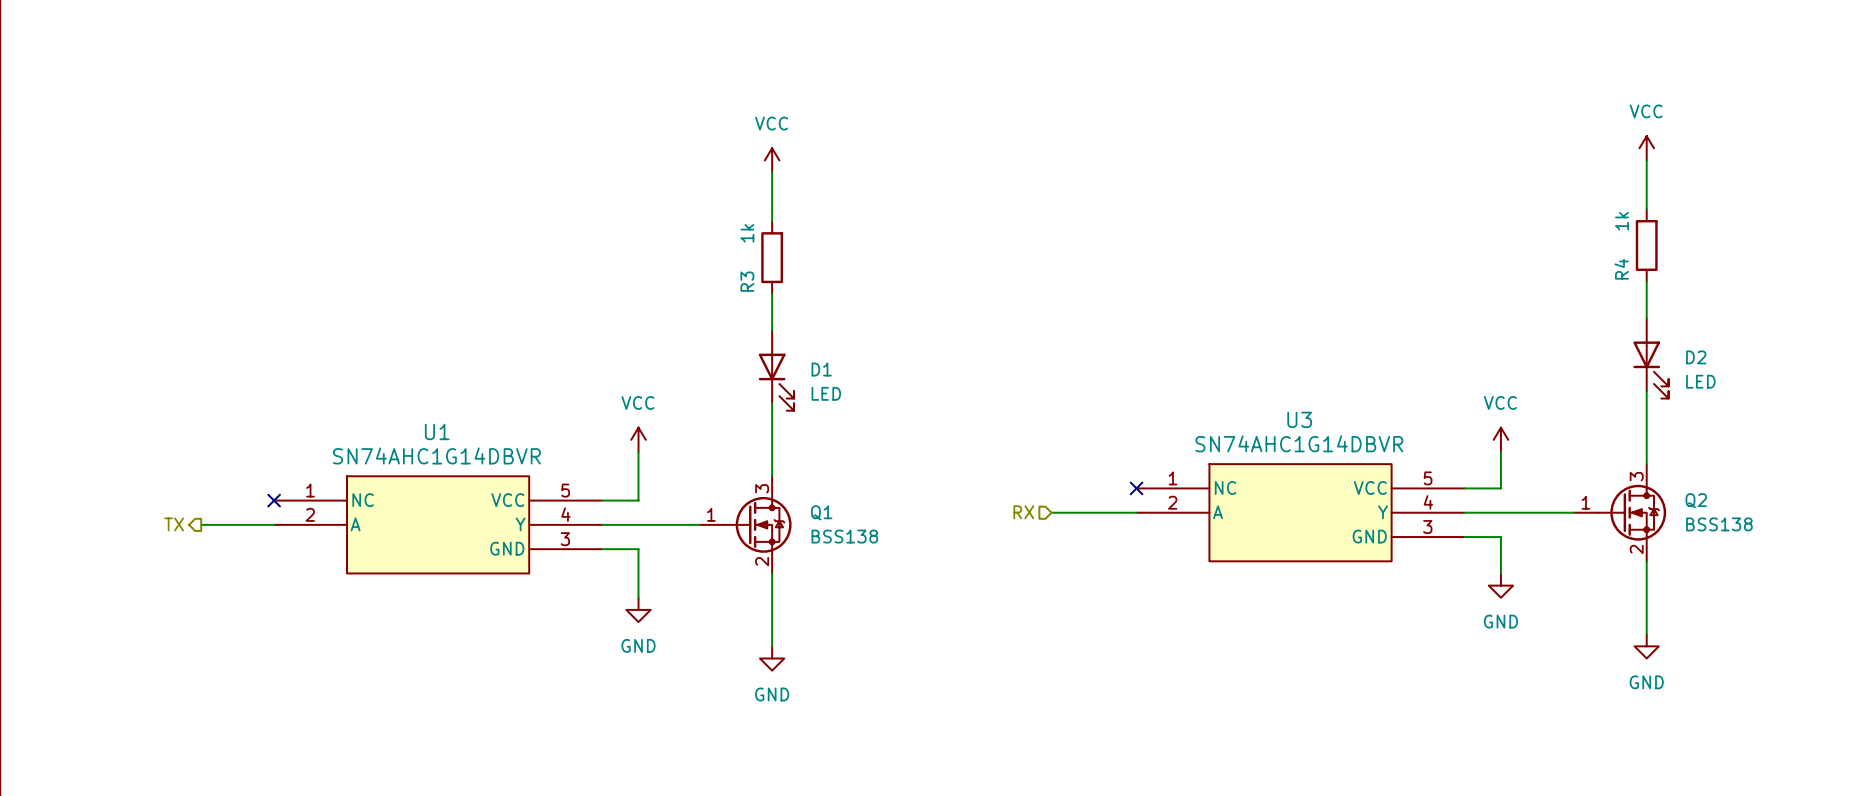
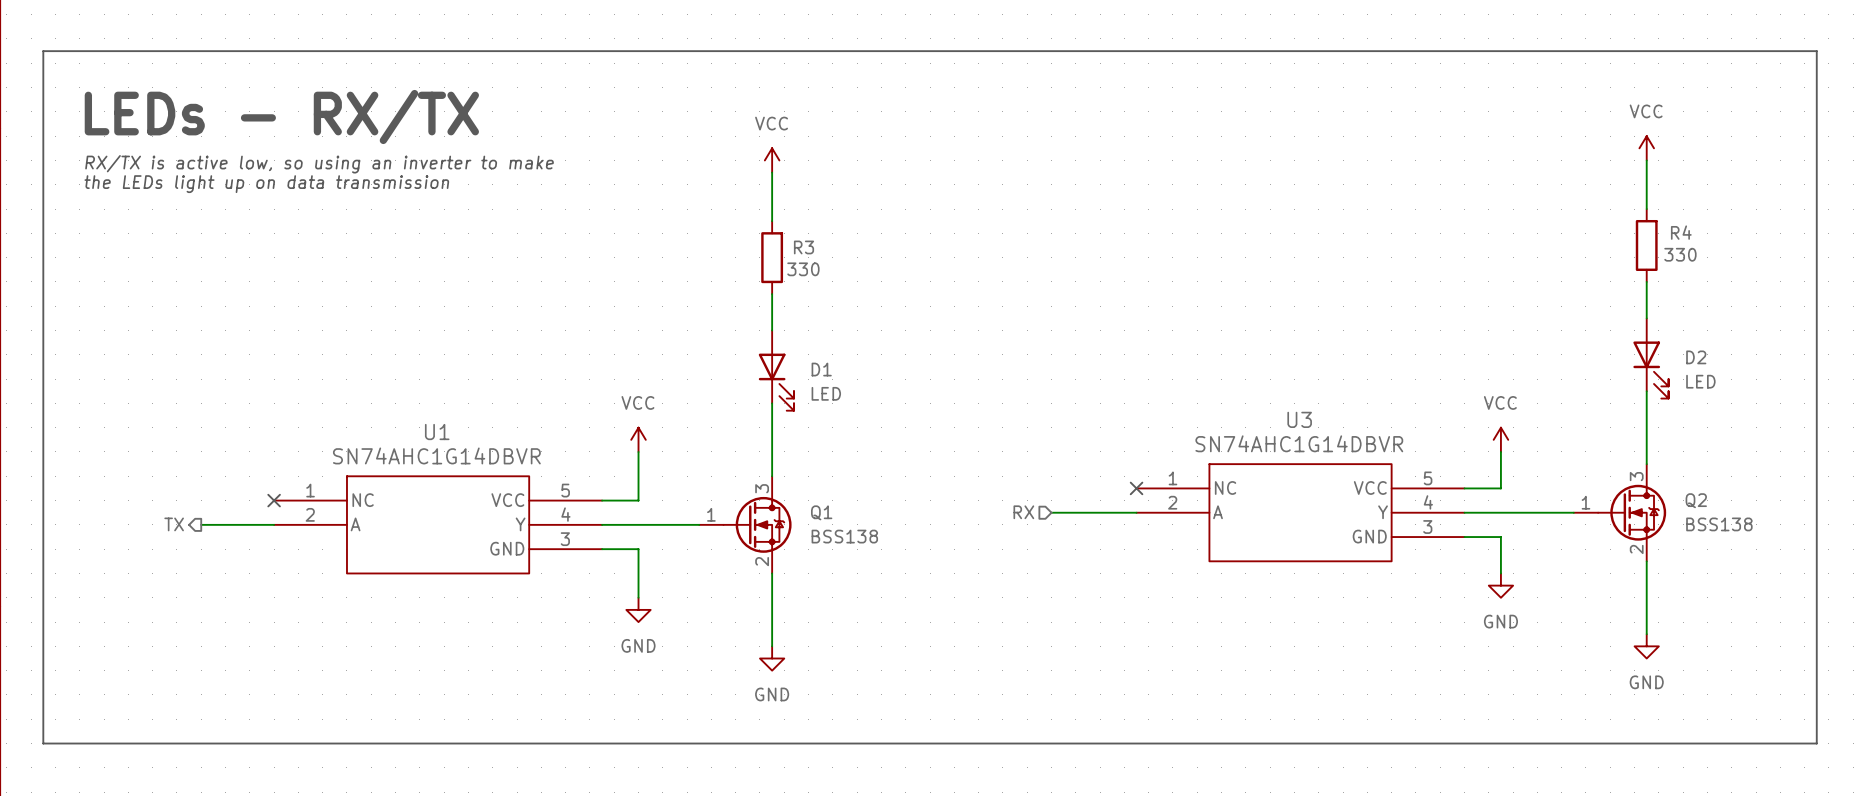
line: none -> (43, 51) (1816, 51) (1816, 743) (43, 743) (43, 51)
text: none -> LEDs - RX/TX (281, 117)
text: none -> RX/TX is active low, so using an inverter to make (319, 164)
text: none -> the LEDs light up on data transmission (266, 184)
R4 value: 1k (1621, 221) -> 330 (1680, 254)
R3 value: 1k (747, 233) -> 330 (803, 269)
R4 name rotation: 0° (1621, 269) -> 90° clockwise (1681, 232)
R4 name position: R4 (1621, 269) -> R4 (1681, 232)
R3 name rotation: 0° (747, 281) -> 90° clockwise (804, 247)
R3 name position: R3 (747, 281) -> R3 (804, 247)

